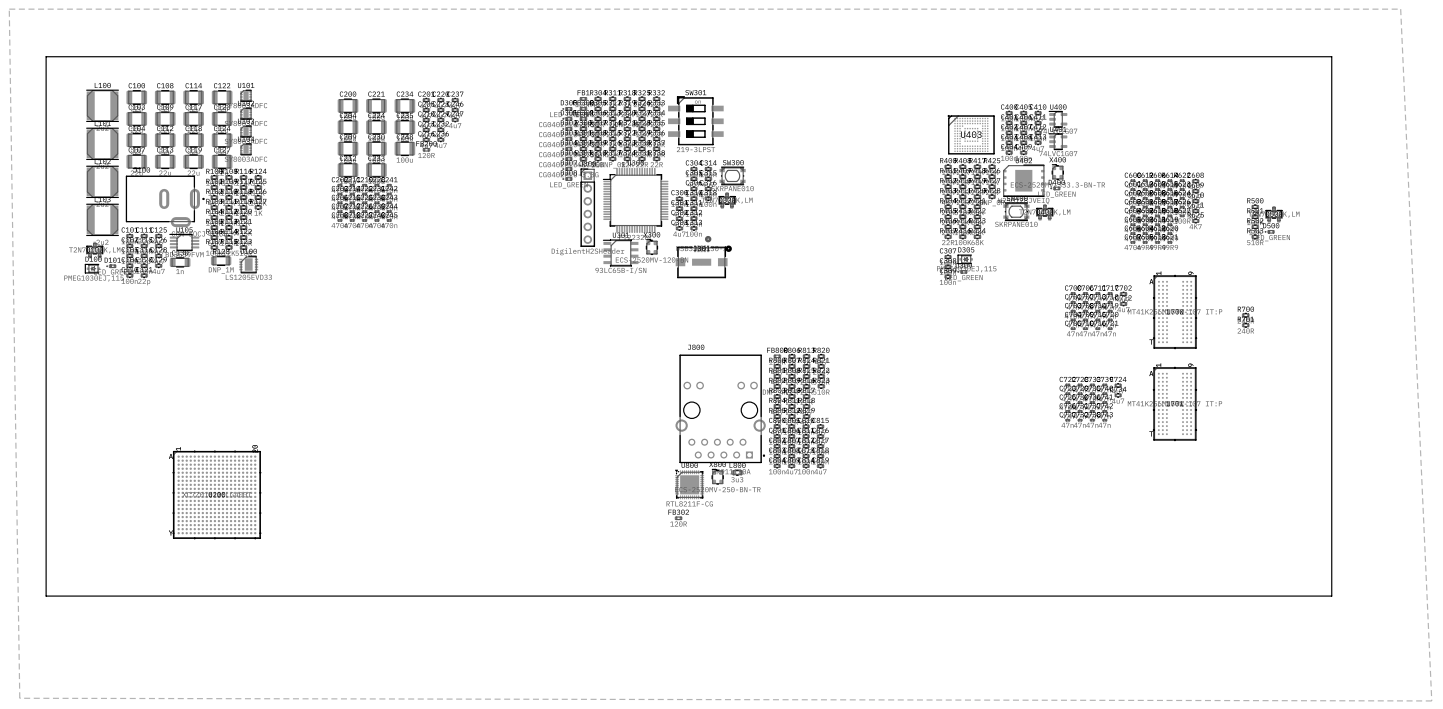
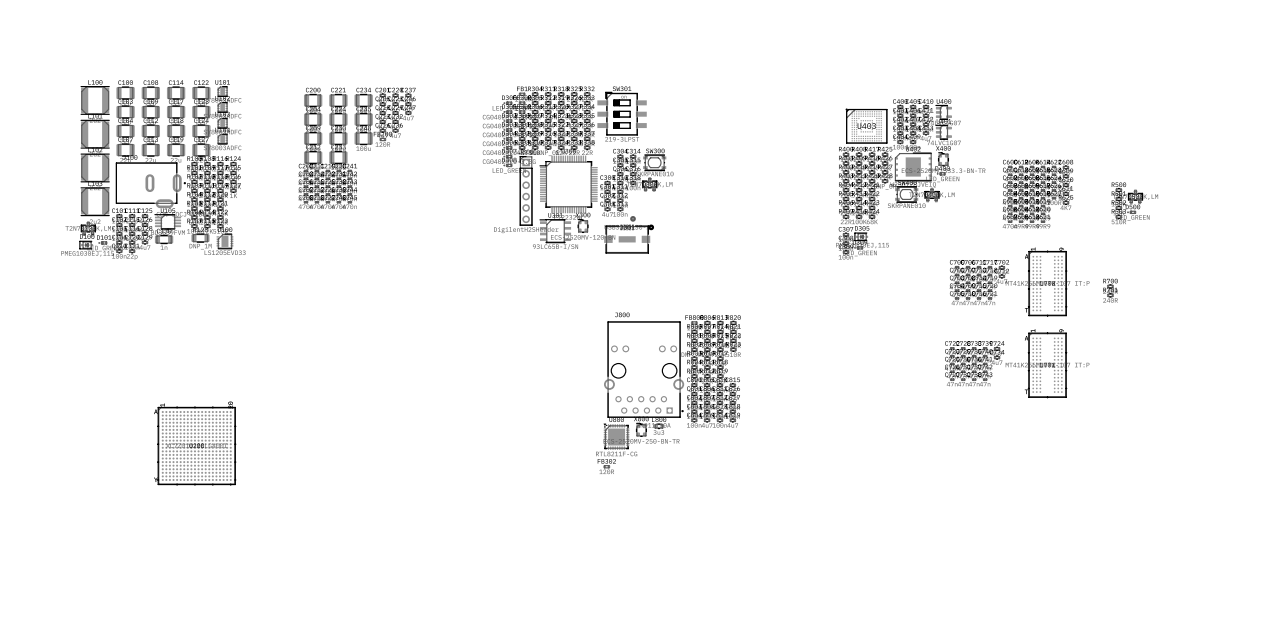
zone outline: (9, 9) (1400, 9) (1431, 700) (19, 698) (9, 9) -> none
board edge: (46, 56) (1331, 56) (1331, 596) (46, 596) (46, 56) -> none

